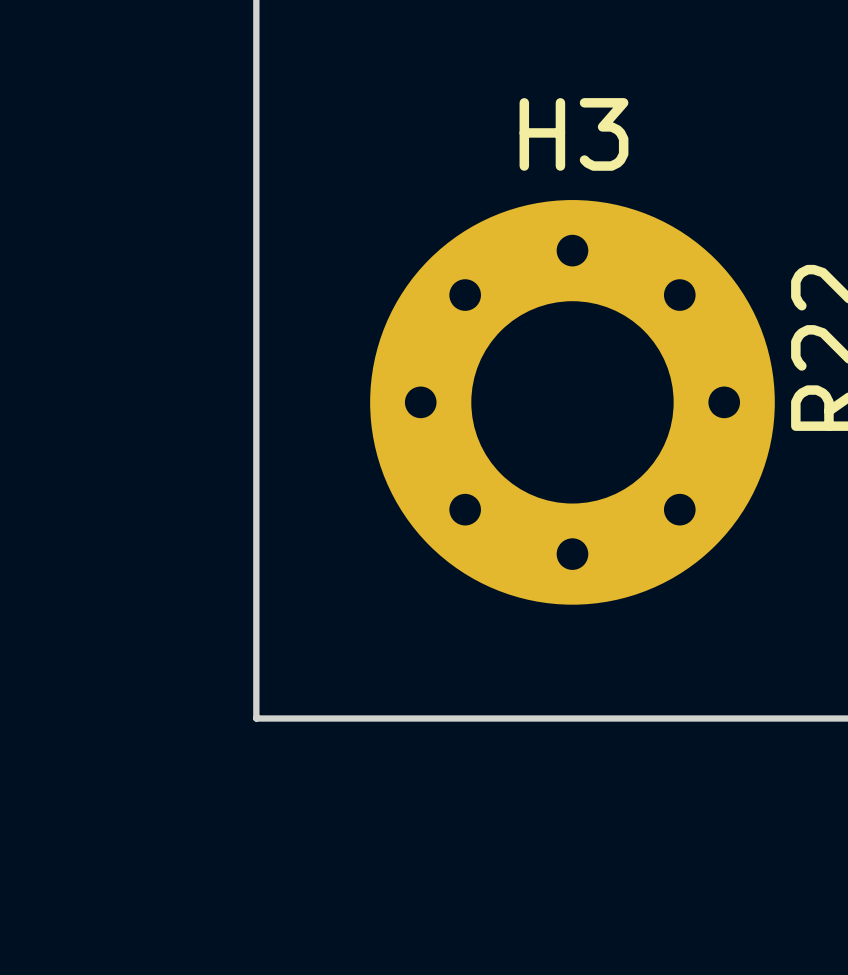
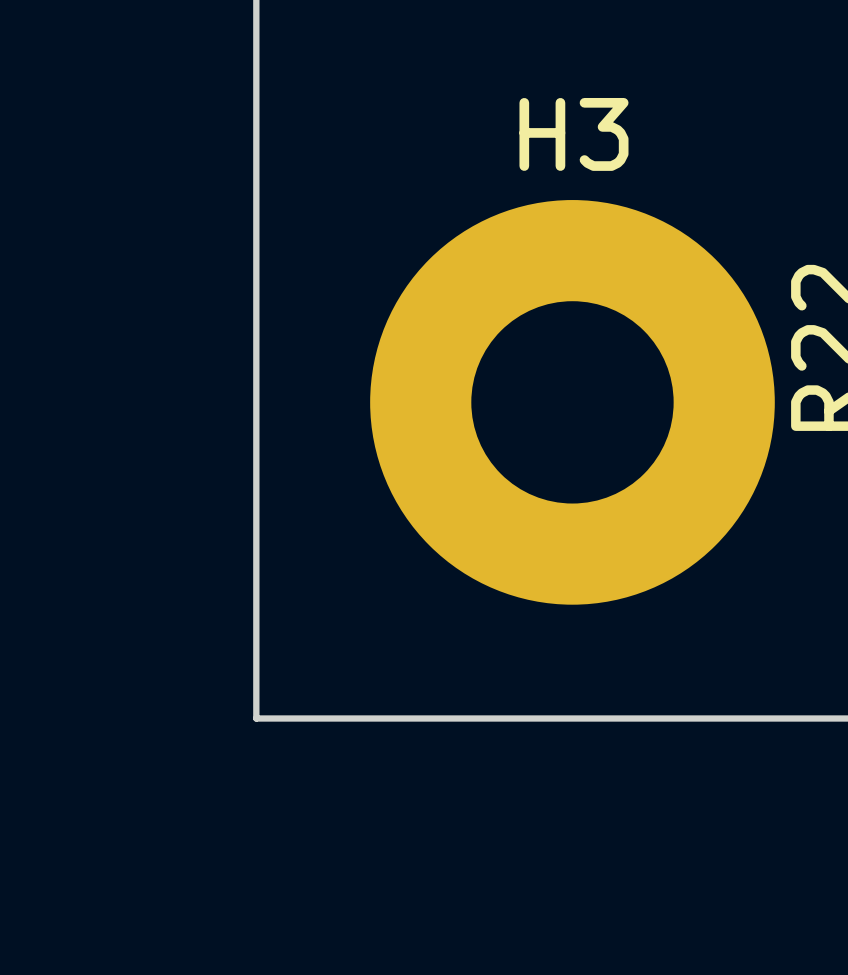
H3 footprint: [370, 200, 775, 605] -> [370, 200, 775, 605]

